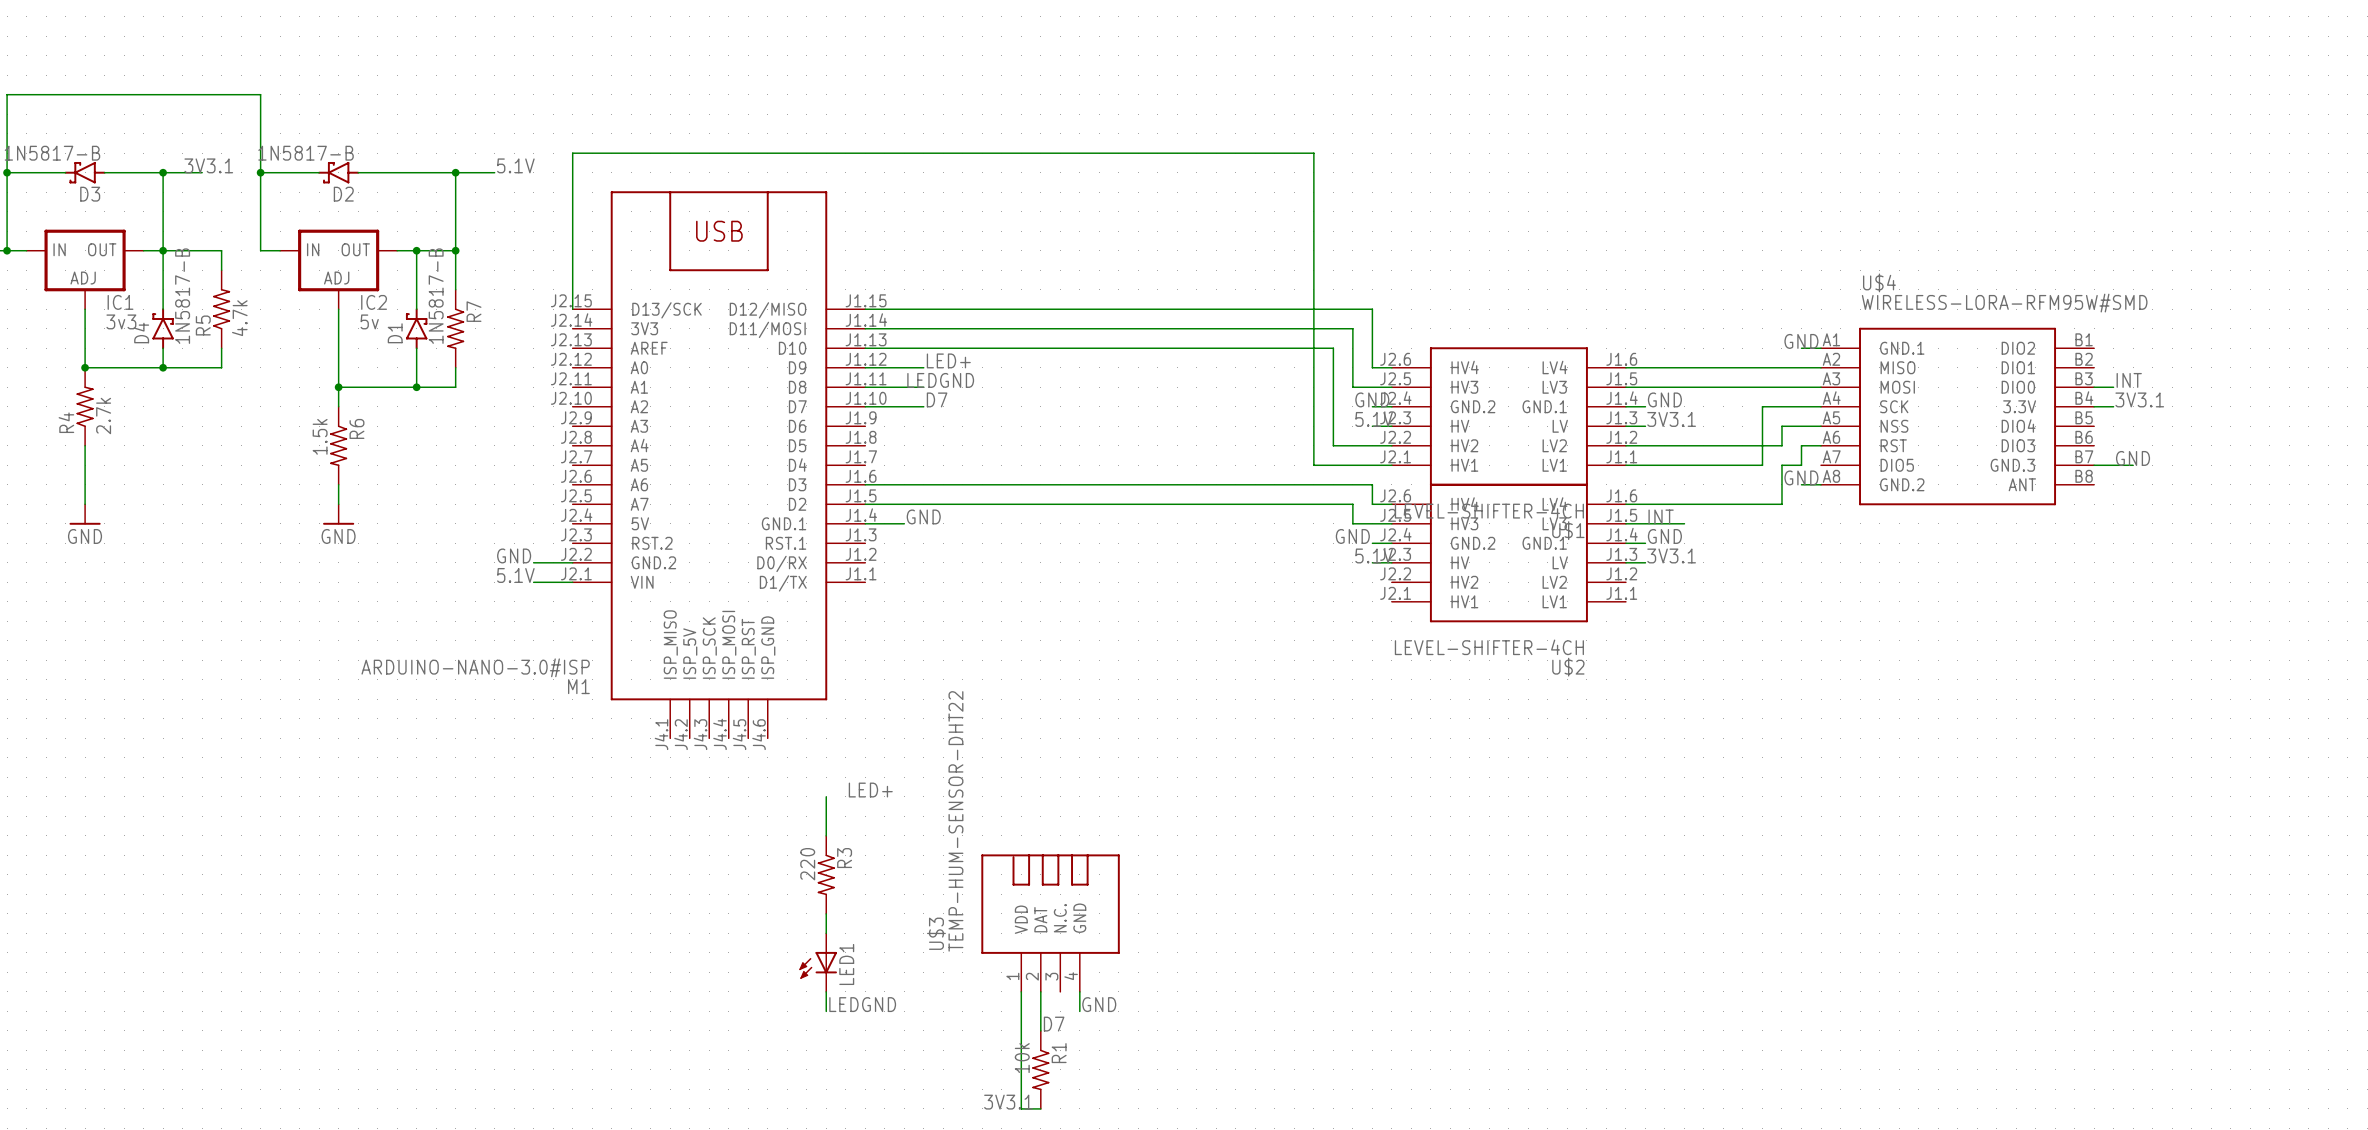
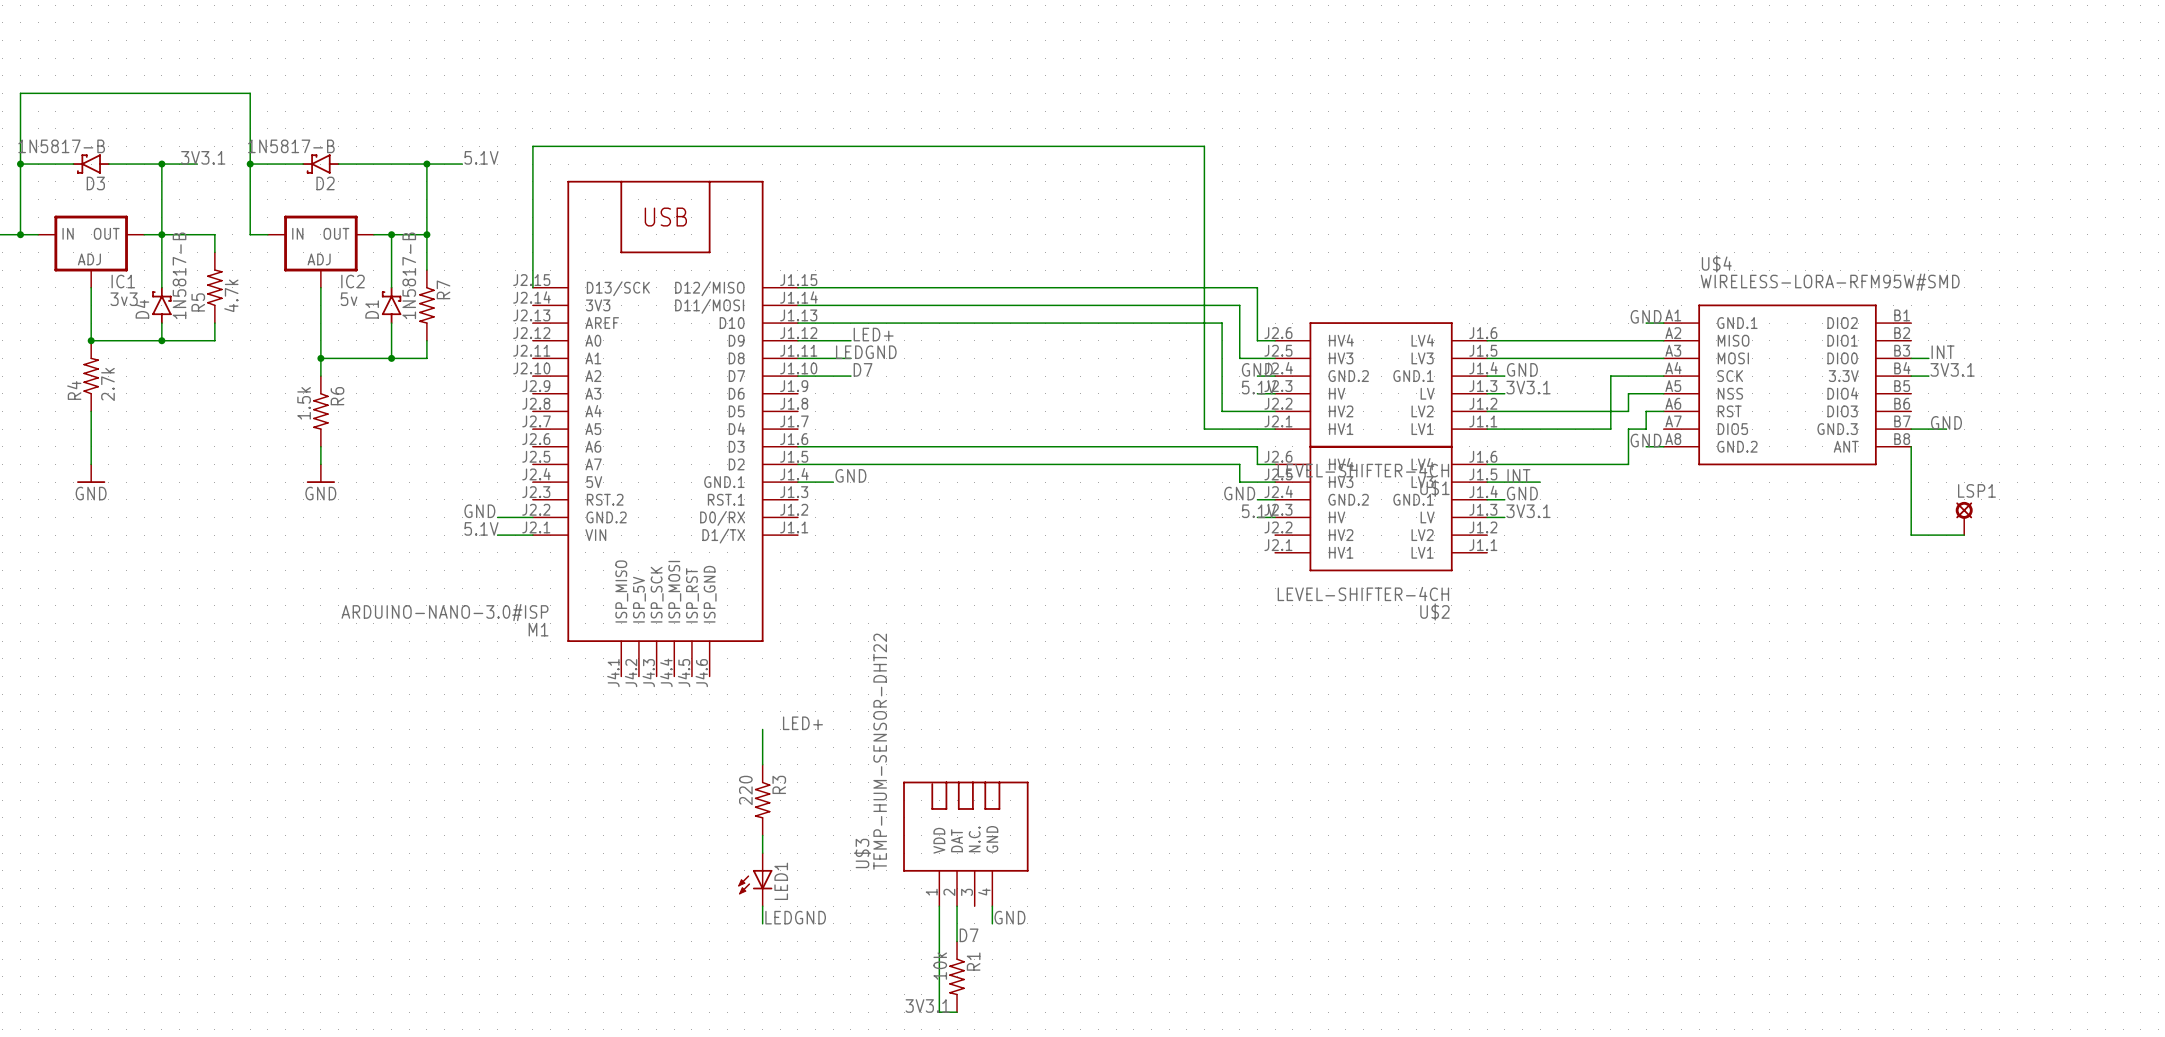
wire: none -> (1911, 446) (1911, 535) (1964, 535)
LSP1: none -> (1964, 518)

